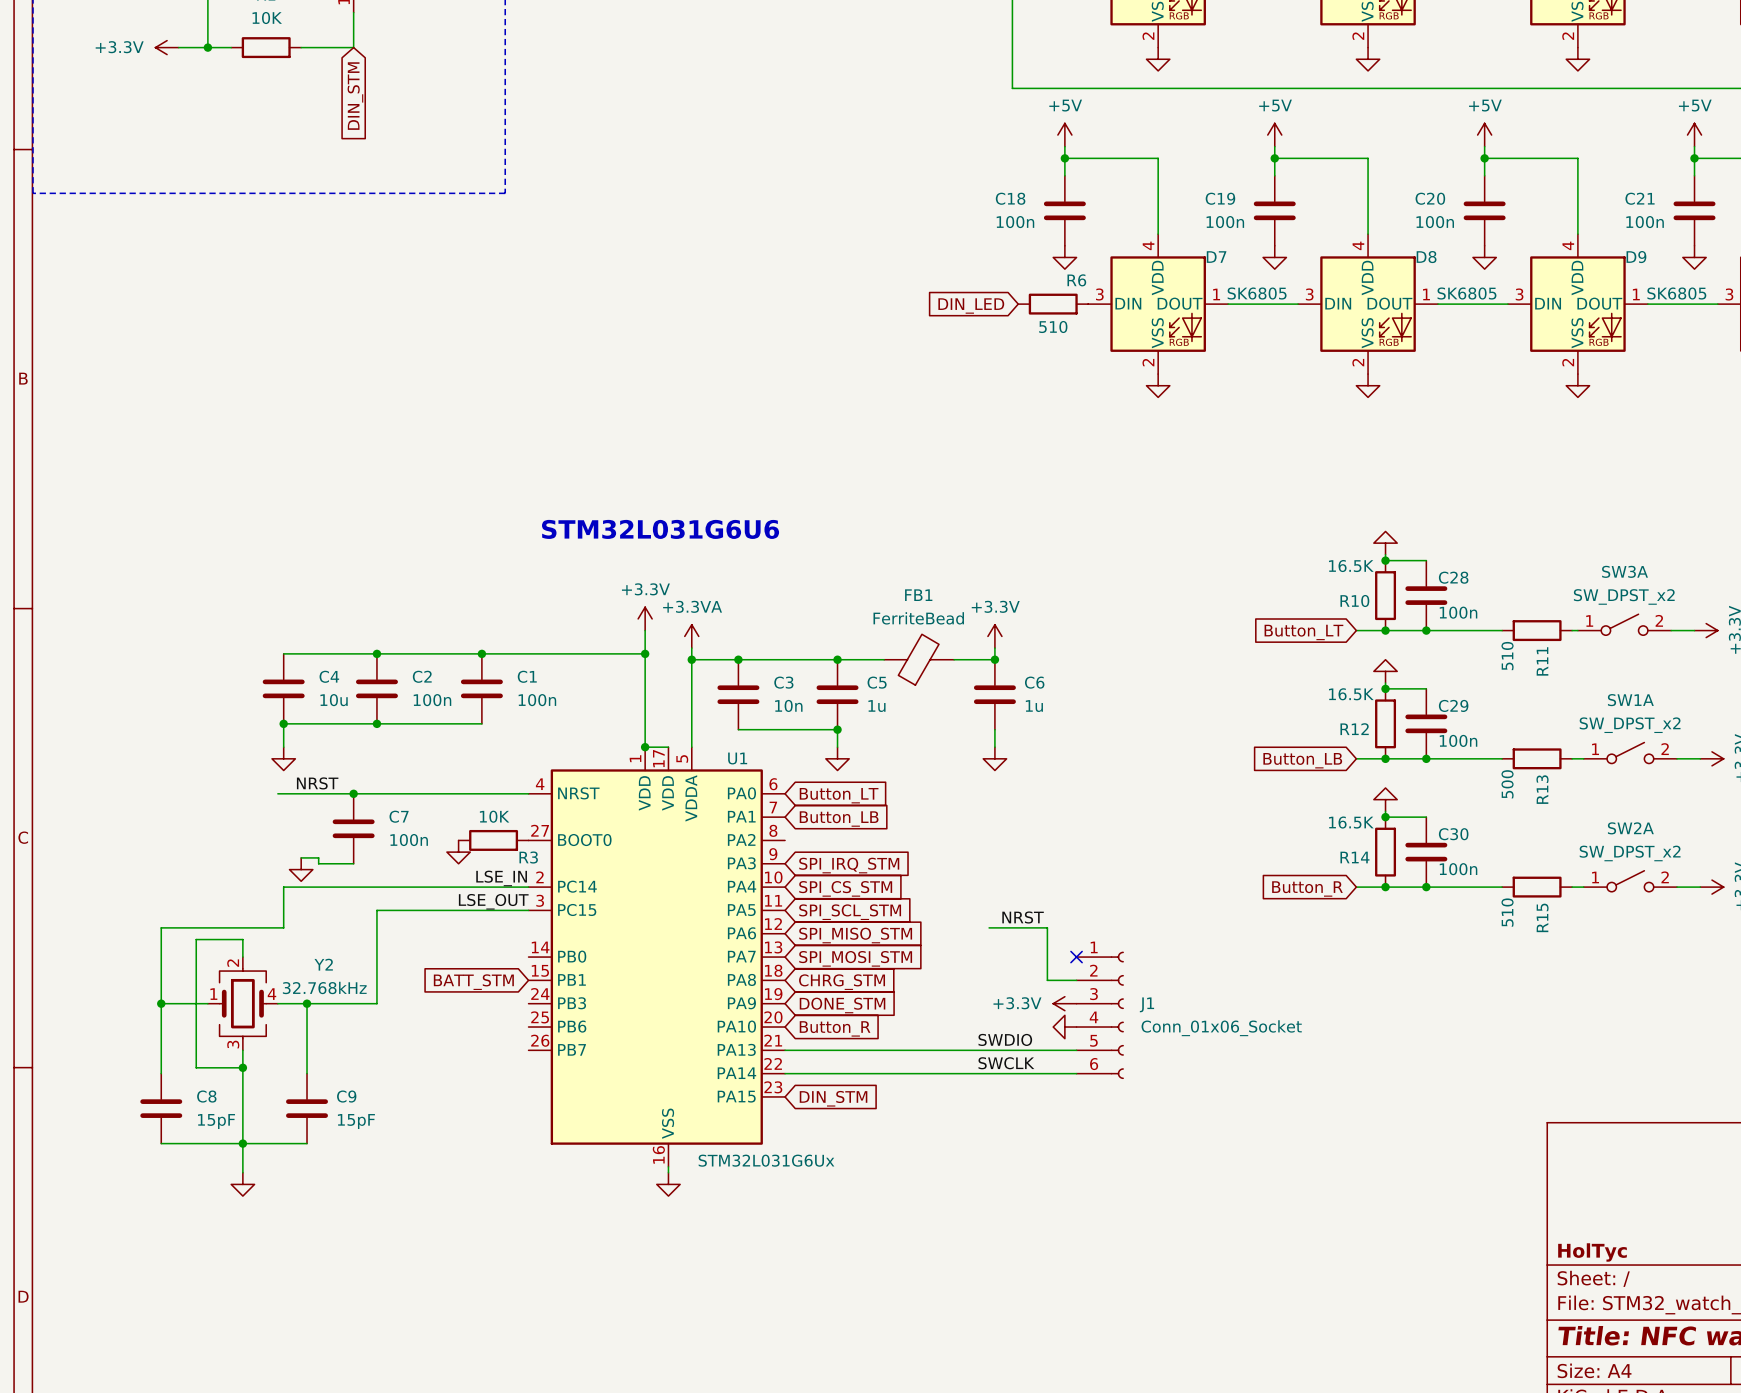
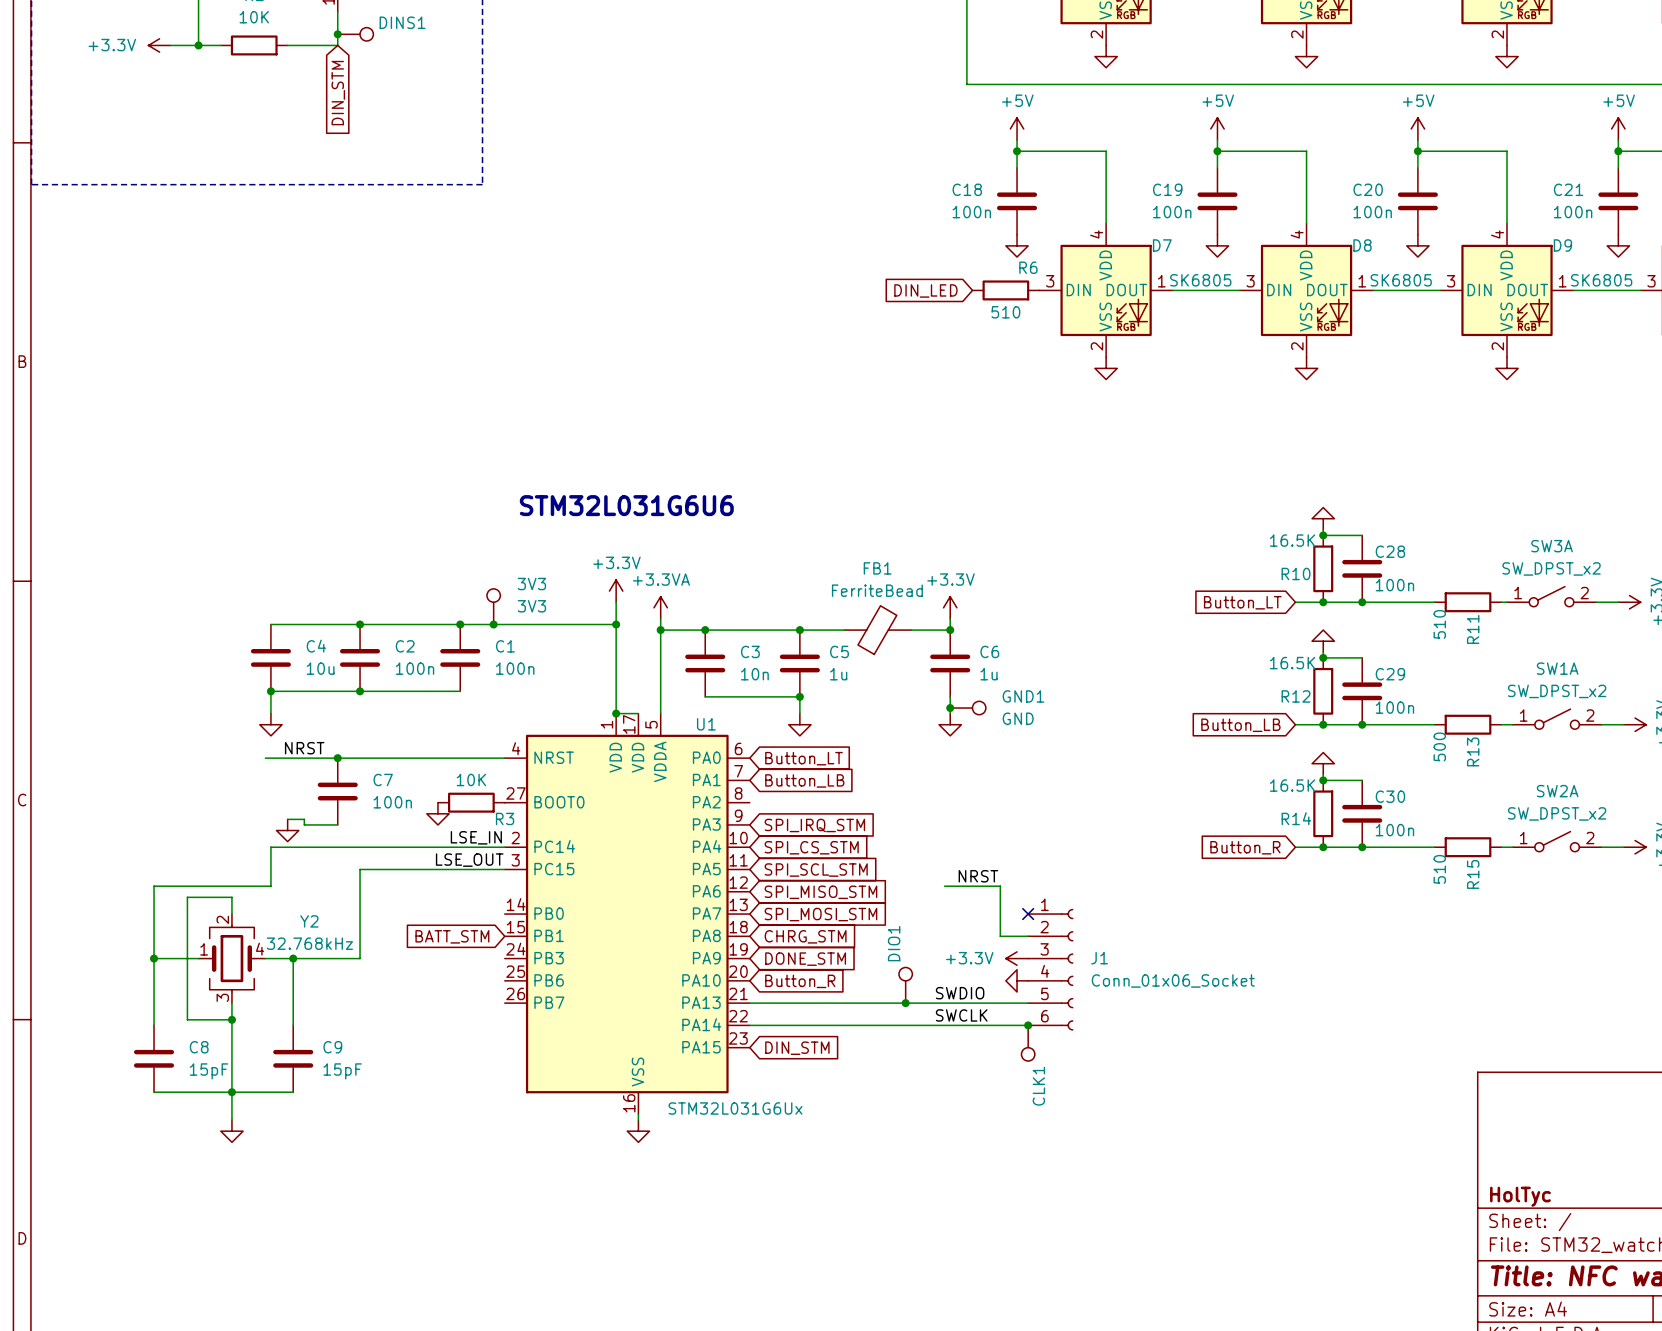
junction: none -> (337, 34)
DINS1: none -> (355, 34)
3V3: none -> 3V3 (493, 606)
junction: none -> (493, 624)
junction: none -> (950, 708)
GND1: none -> GND (968, 708)
DIO1: none -> (905, 985)
junction: none -> (905, 1003)
junction: none -> (1028, 1025)
CLK1: none -> (1028, 1043)

